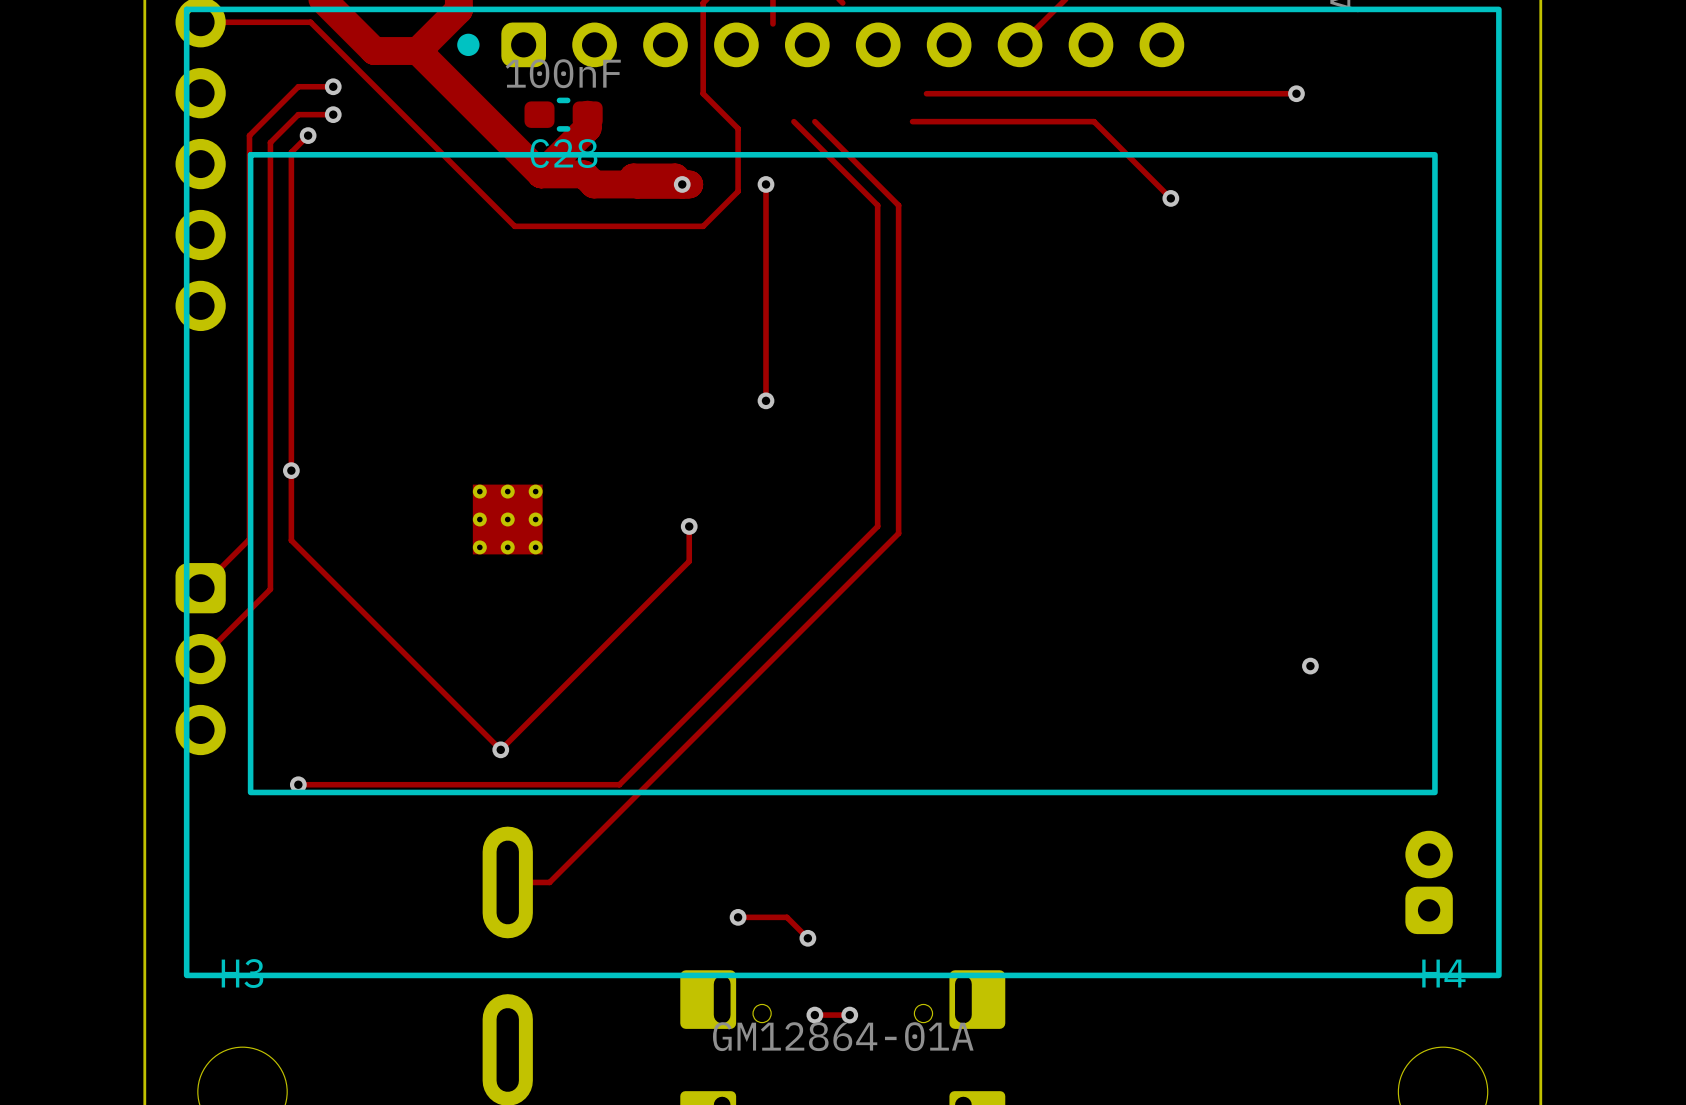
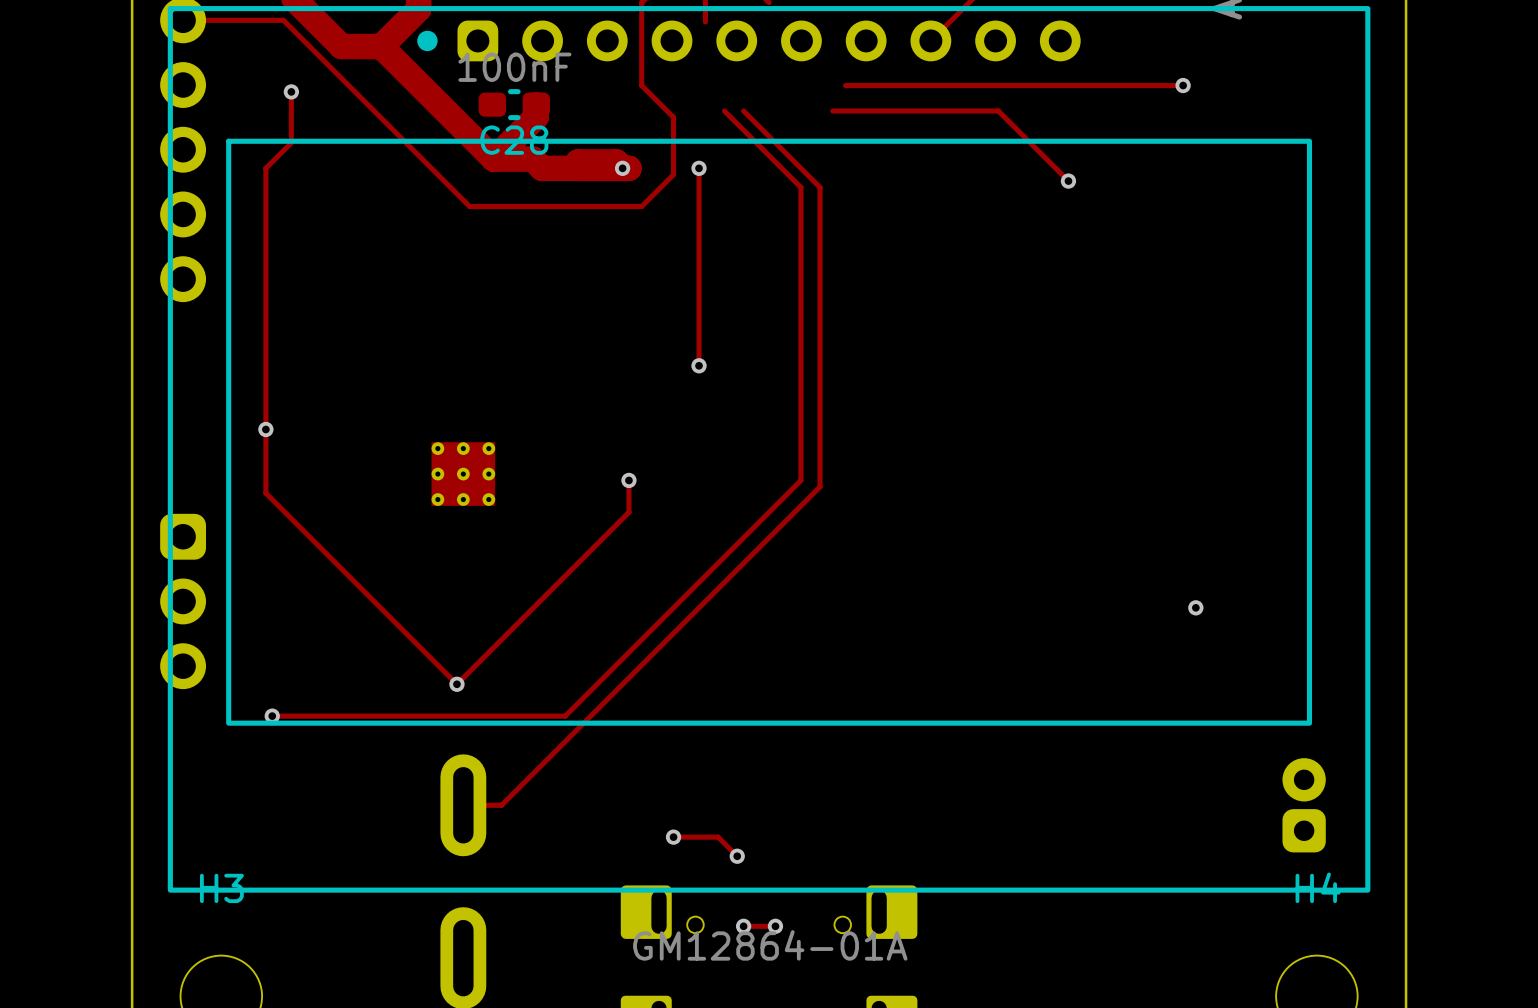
track: (333, 86) (298, 86) (249, 135) (249, 539) (200, 588) -> none
via: (333, 86) -> none
via: none -> (291, 91)
track: (333, 114) (298, 114) (270, 142) (270, 589) (200, 659) -> none
via: (333, 114) -> none
track: (308, 135) (291, 152) (291, 184) -> (291, 91) (291, 142) (265, 168)
via: (308, 135) -> none

